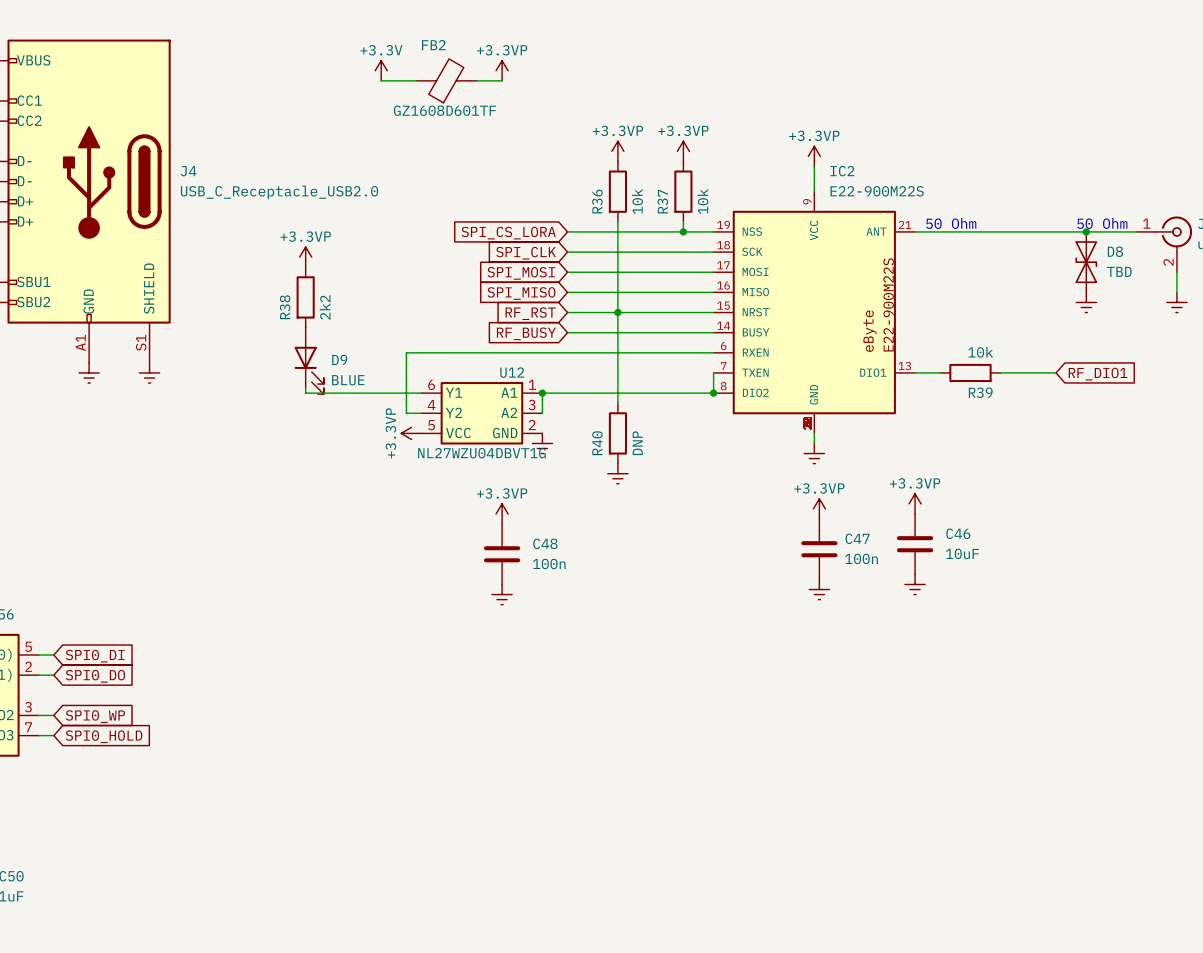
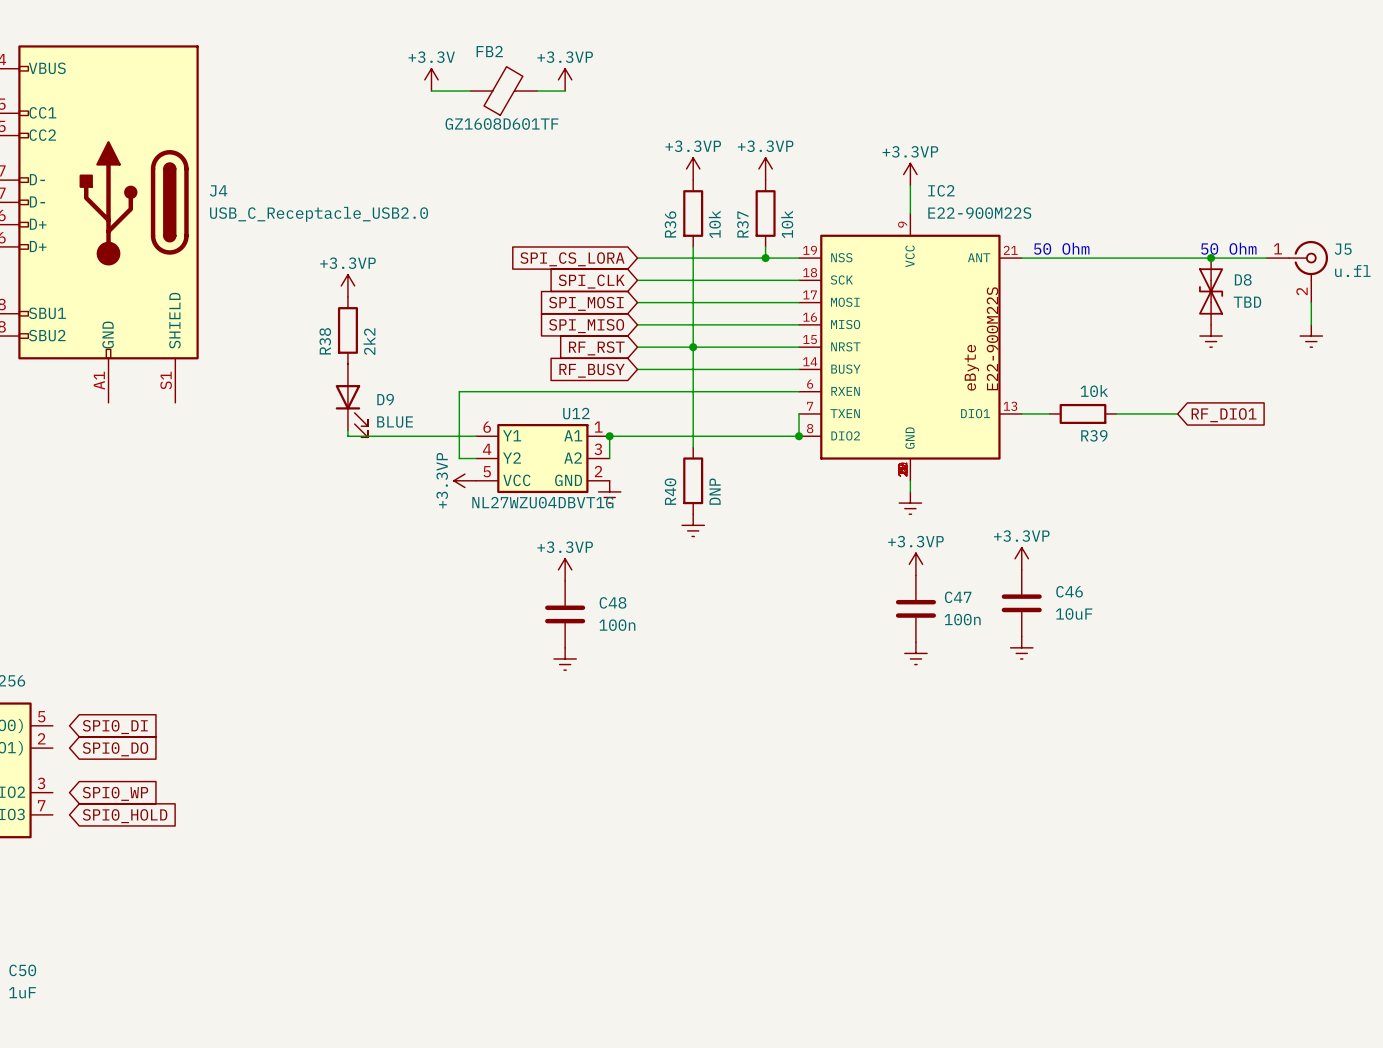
power symbol: (89, 372) -> none
power symbol: (149, 372) -> none
wire: (38, 655) (53, 655) -> none
wire: (38, 675) (53, 675) -> none
wire: (38, 715) (53, 715) -> none
wire: (38, 735) (53, 735) -> none

